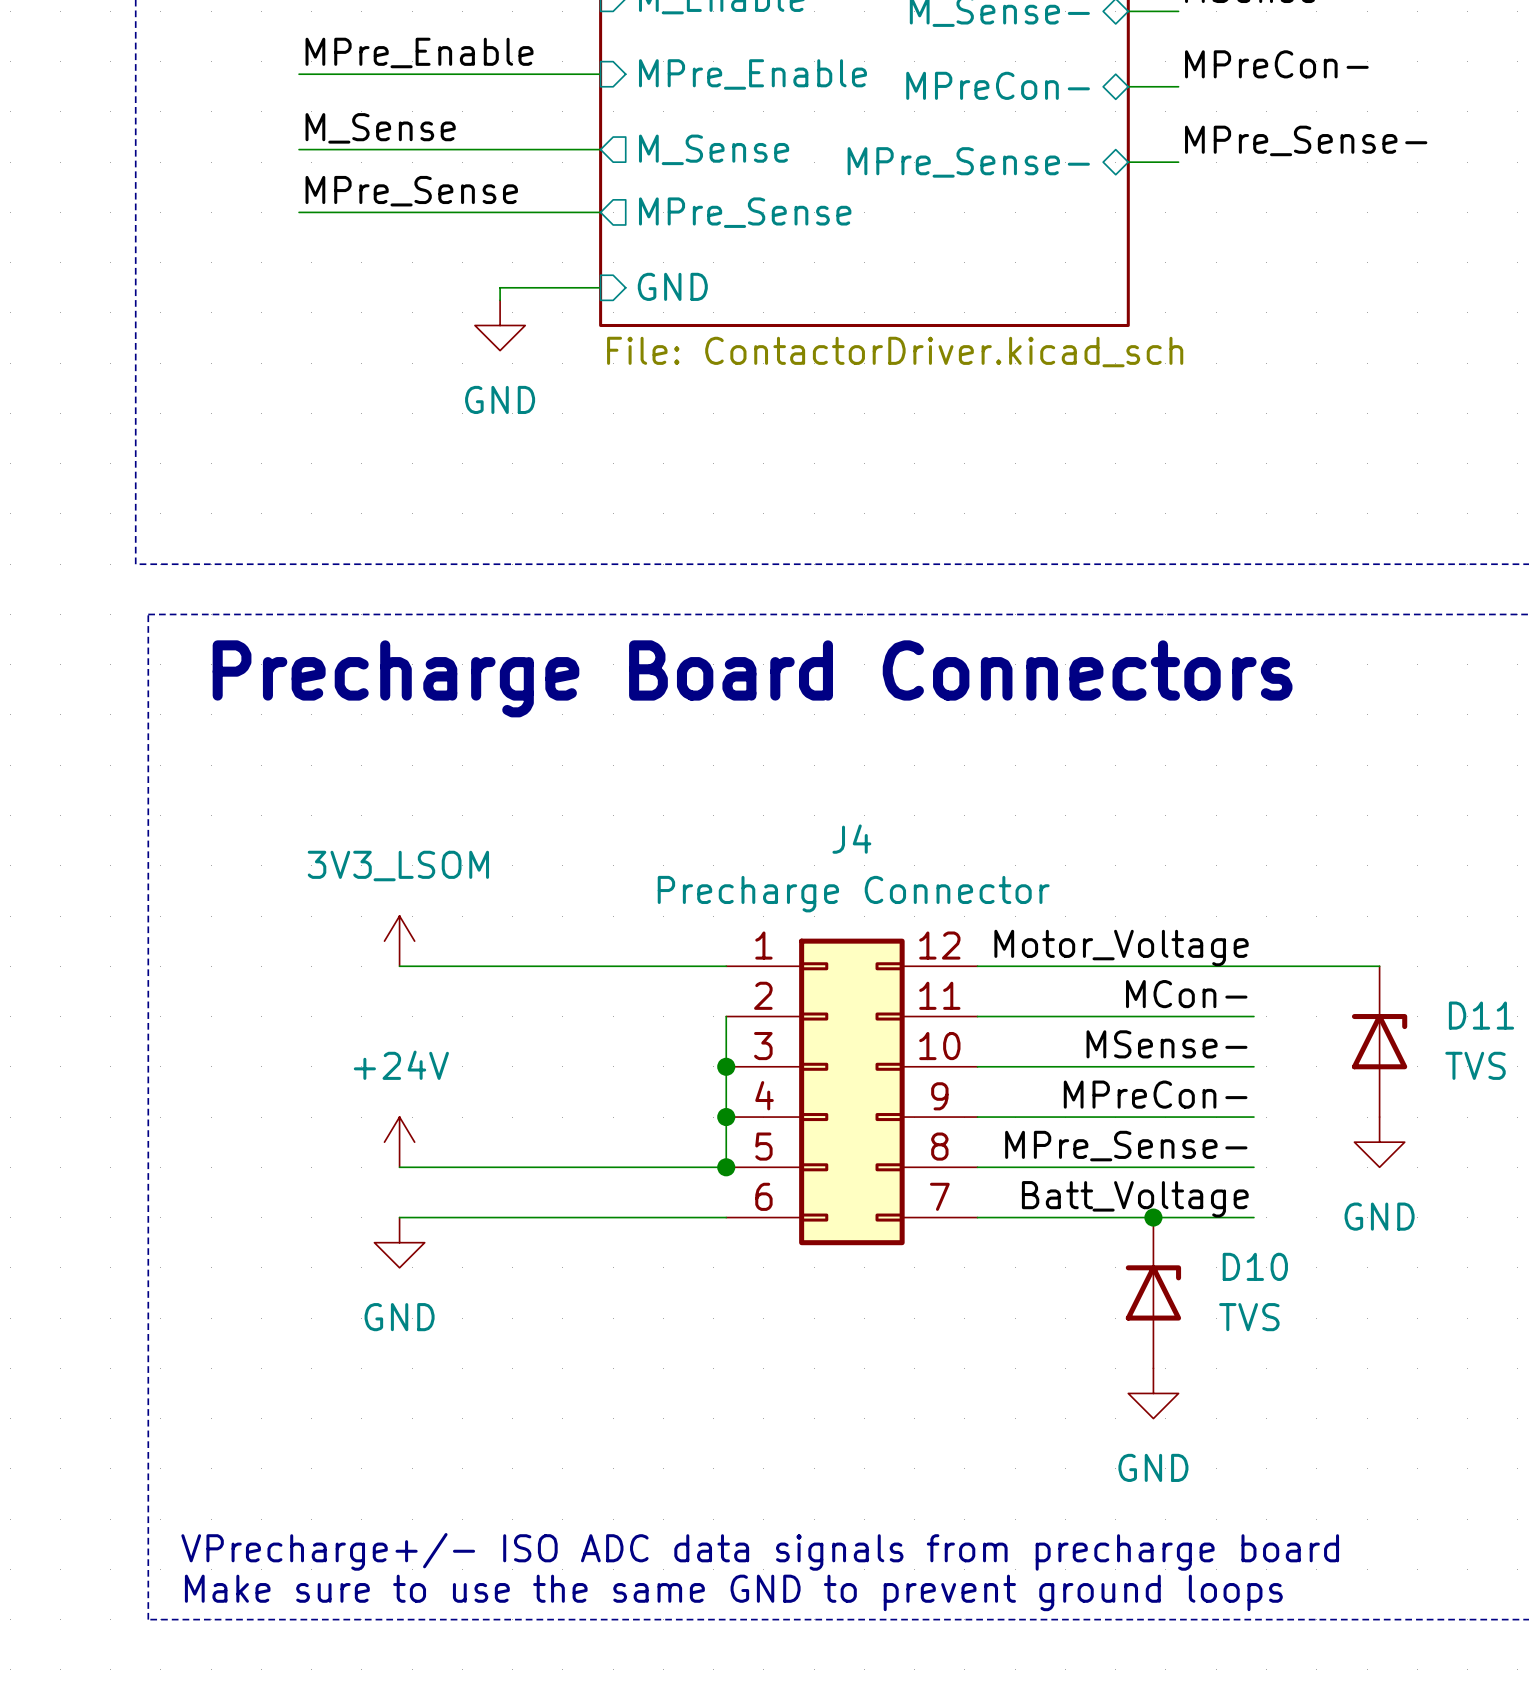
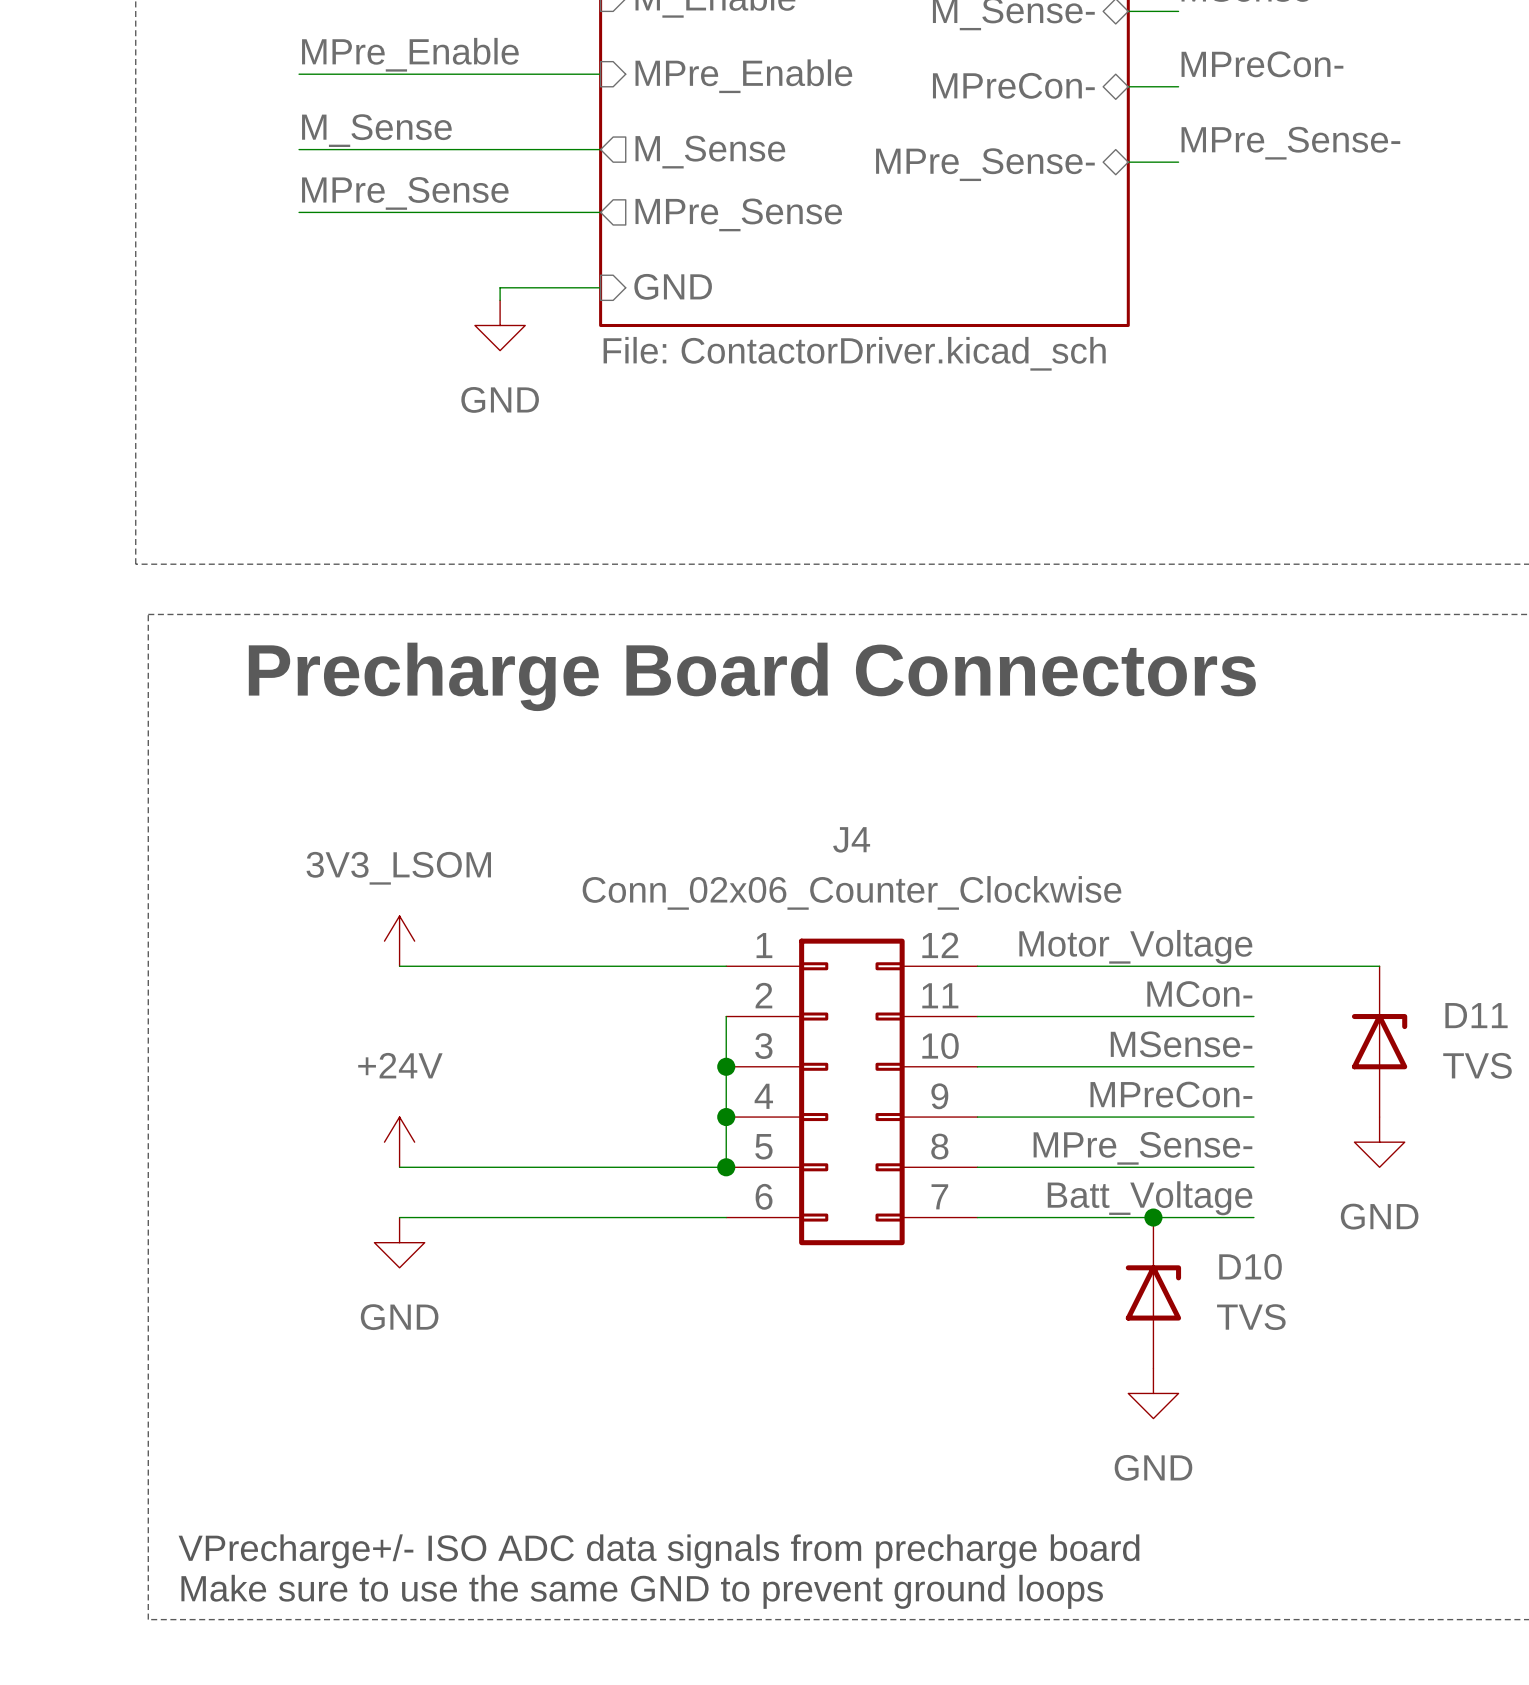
J4 value: Precharge Connector (853, 894) -> Conn_02x06_Counter_Clockwise (852, 892)

